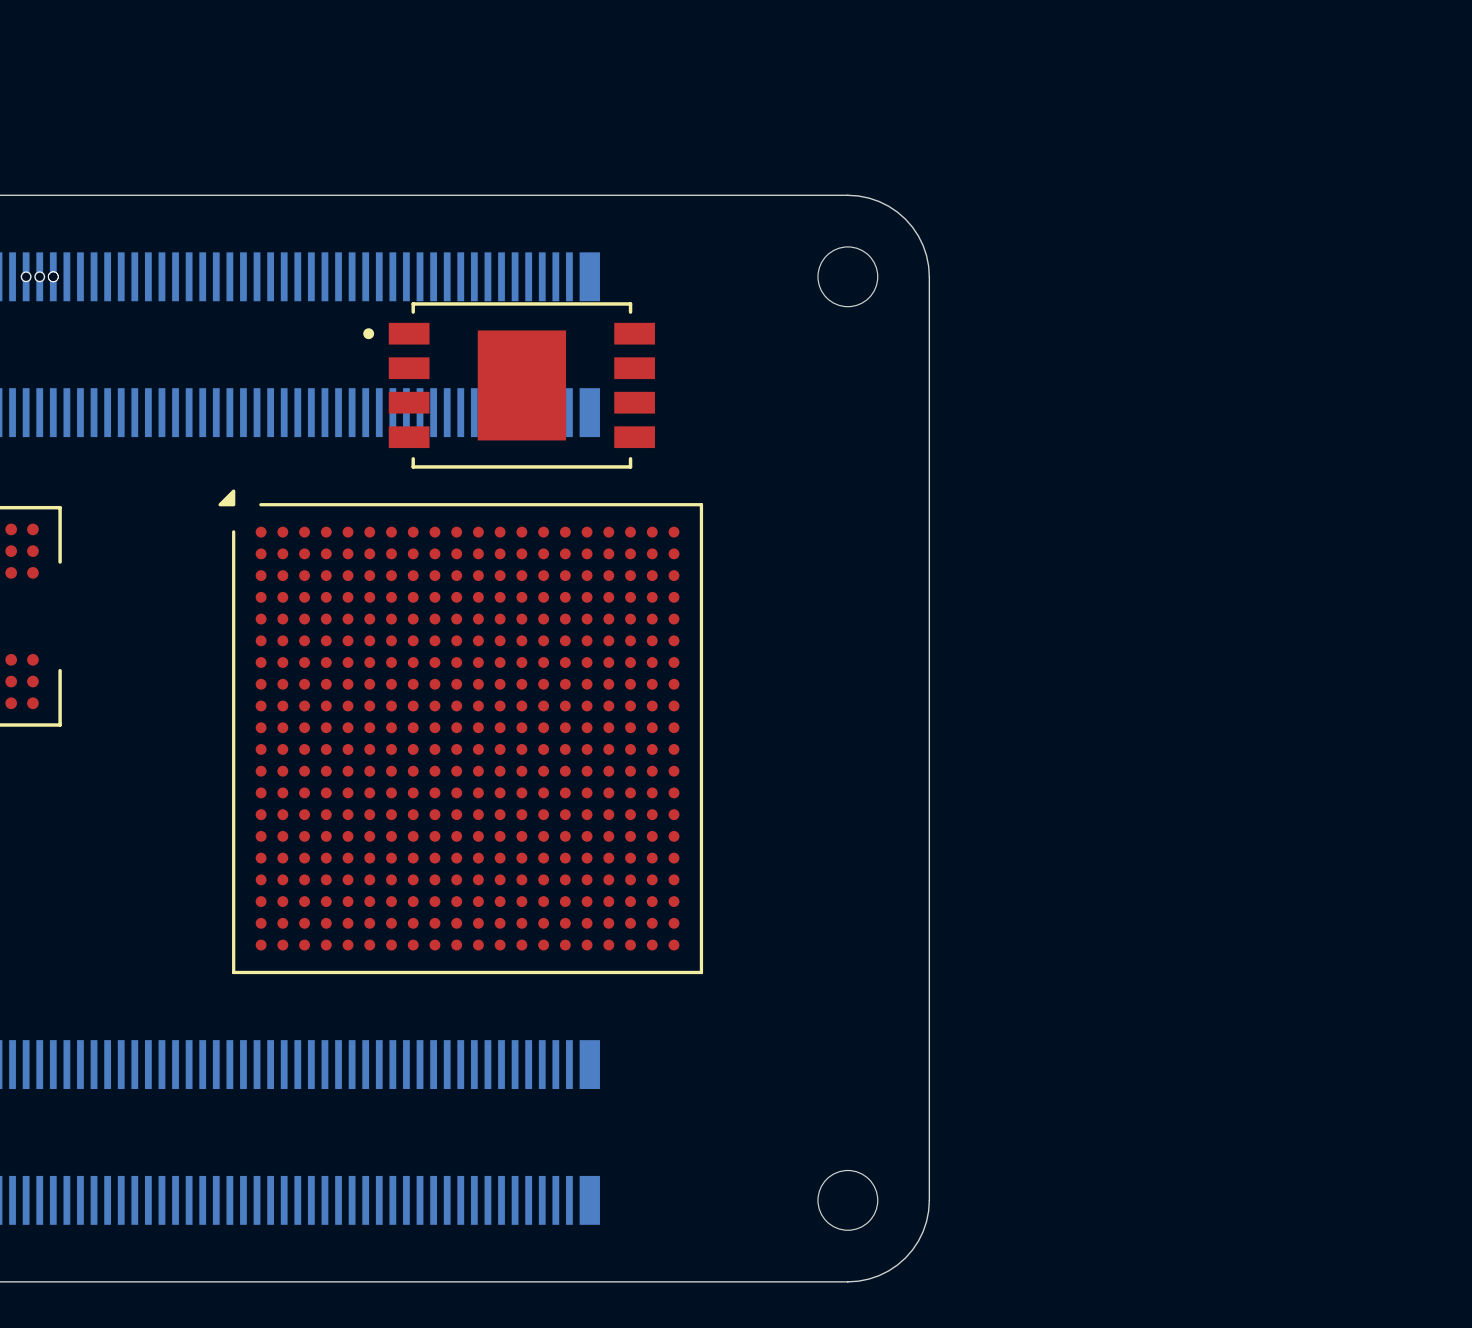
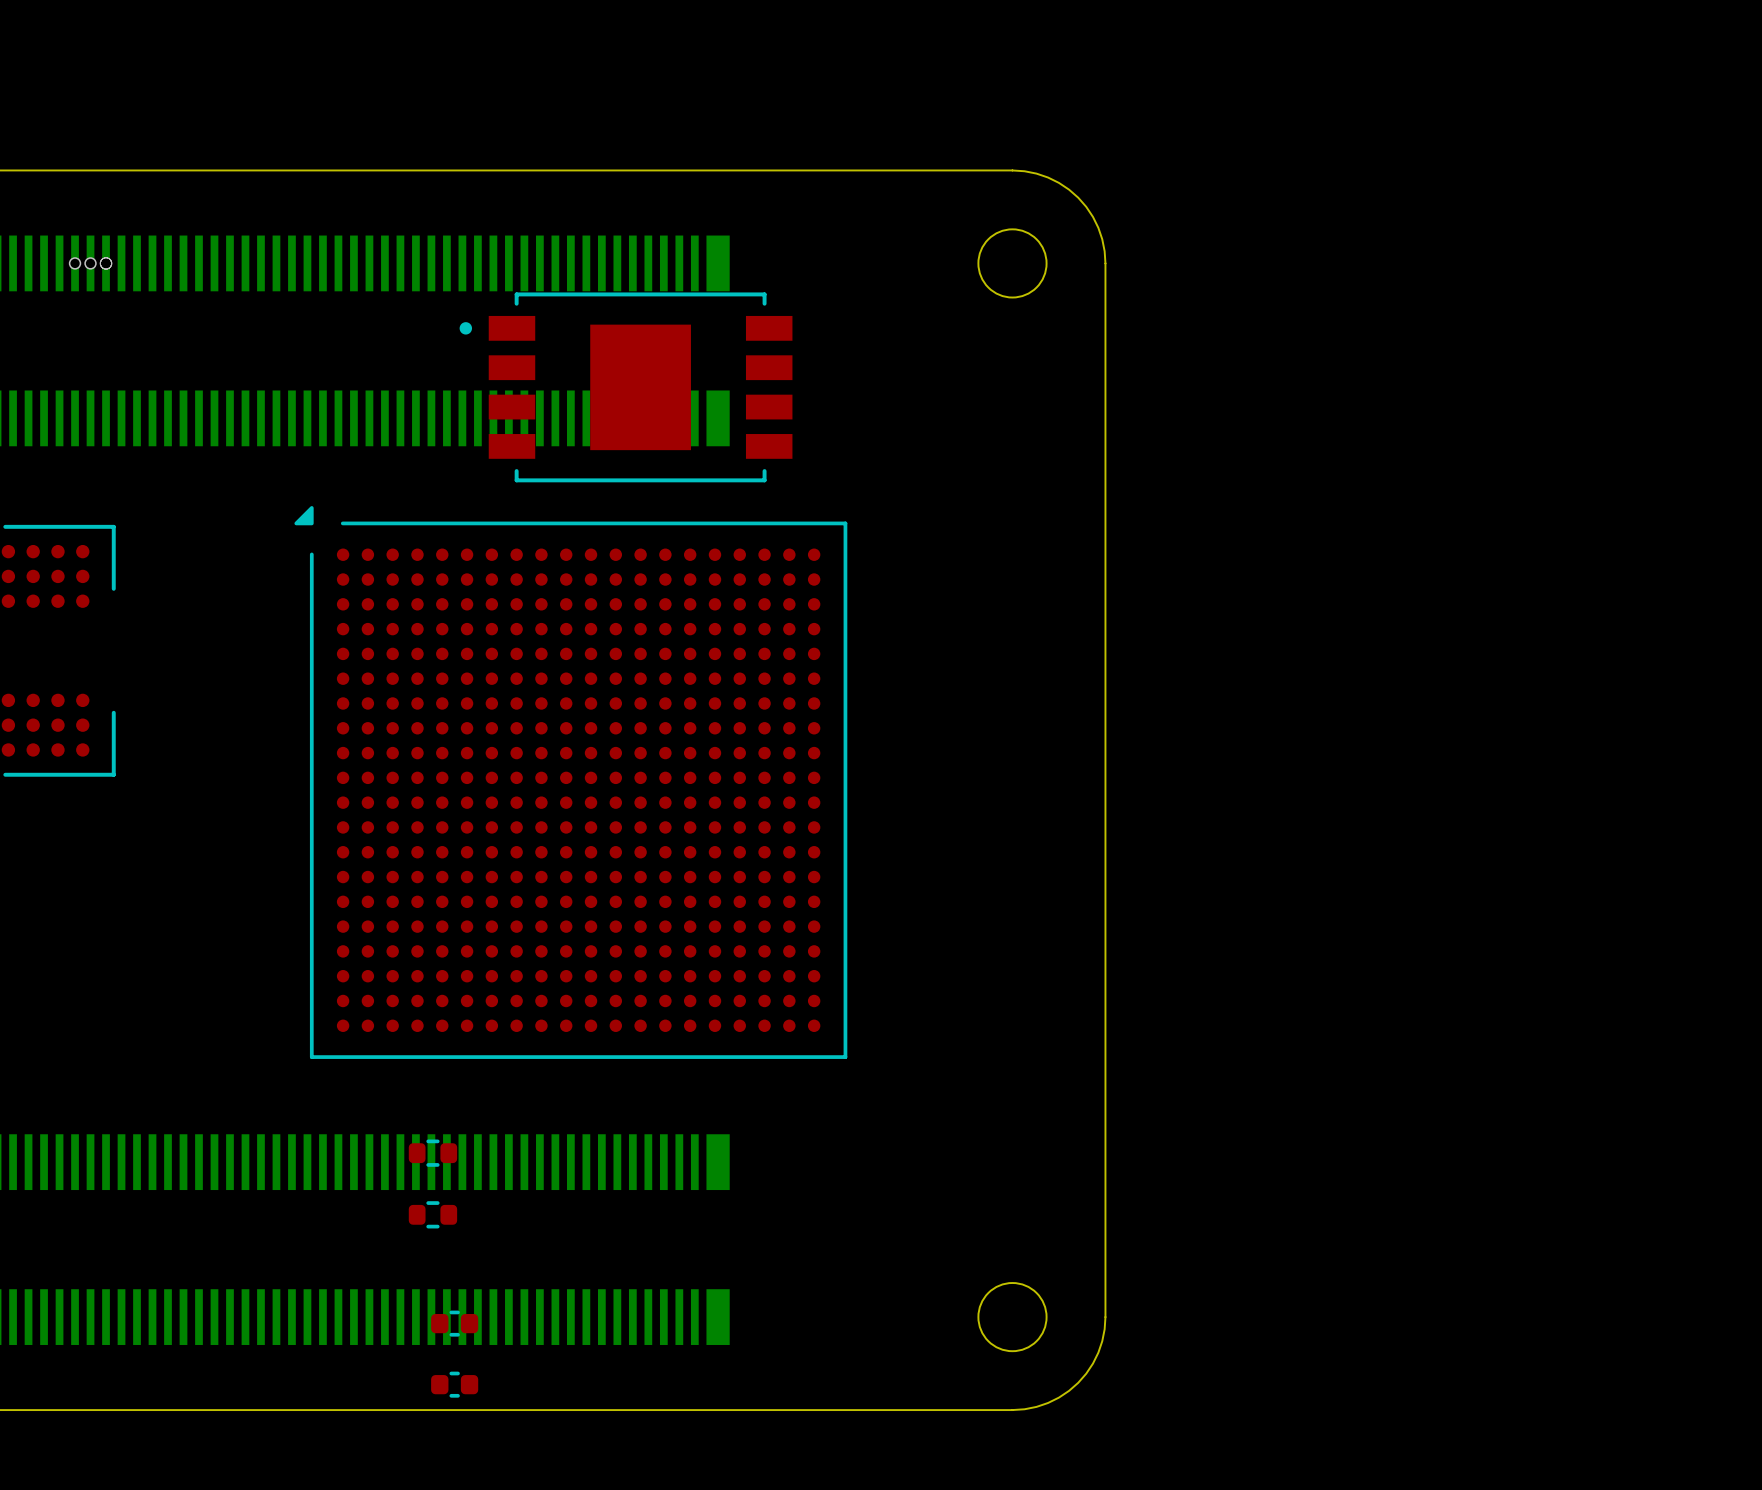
part: none -> (432, 1153)
part: none -> (432, 1214)
part: none -> (454, 1323)
part: none -> (454, 1384)

